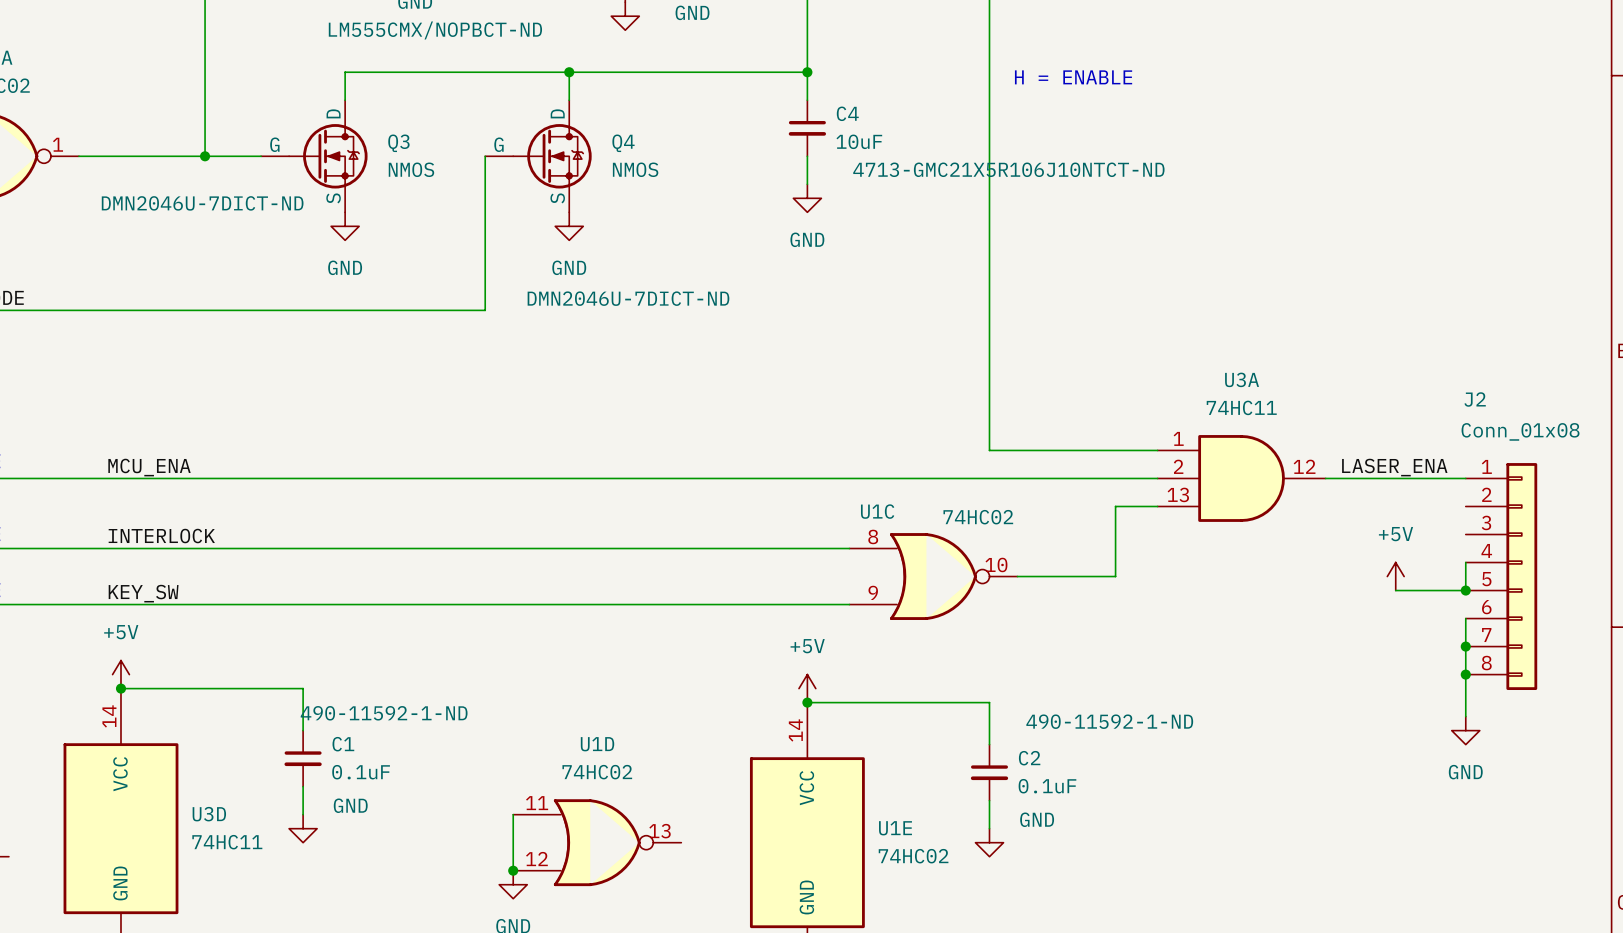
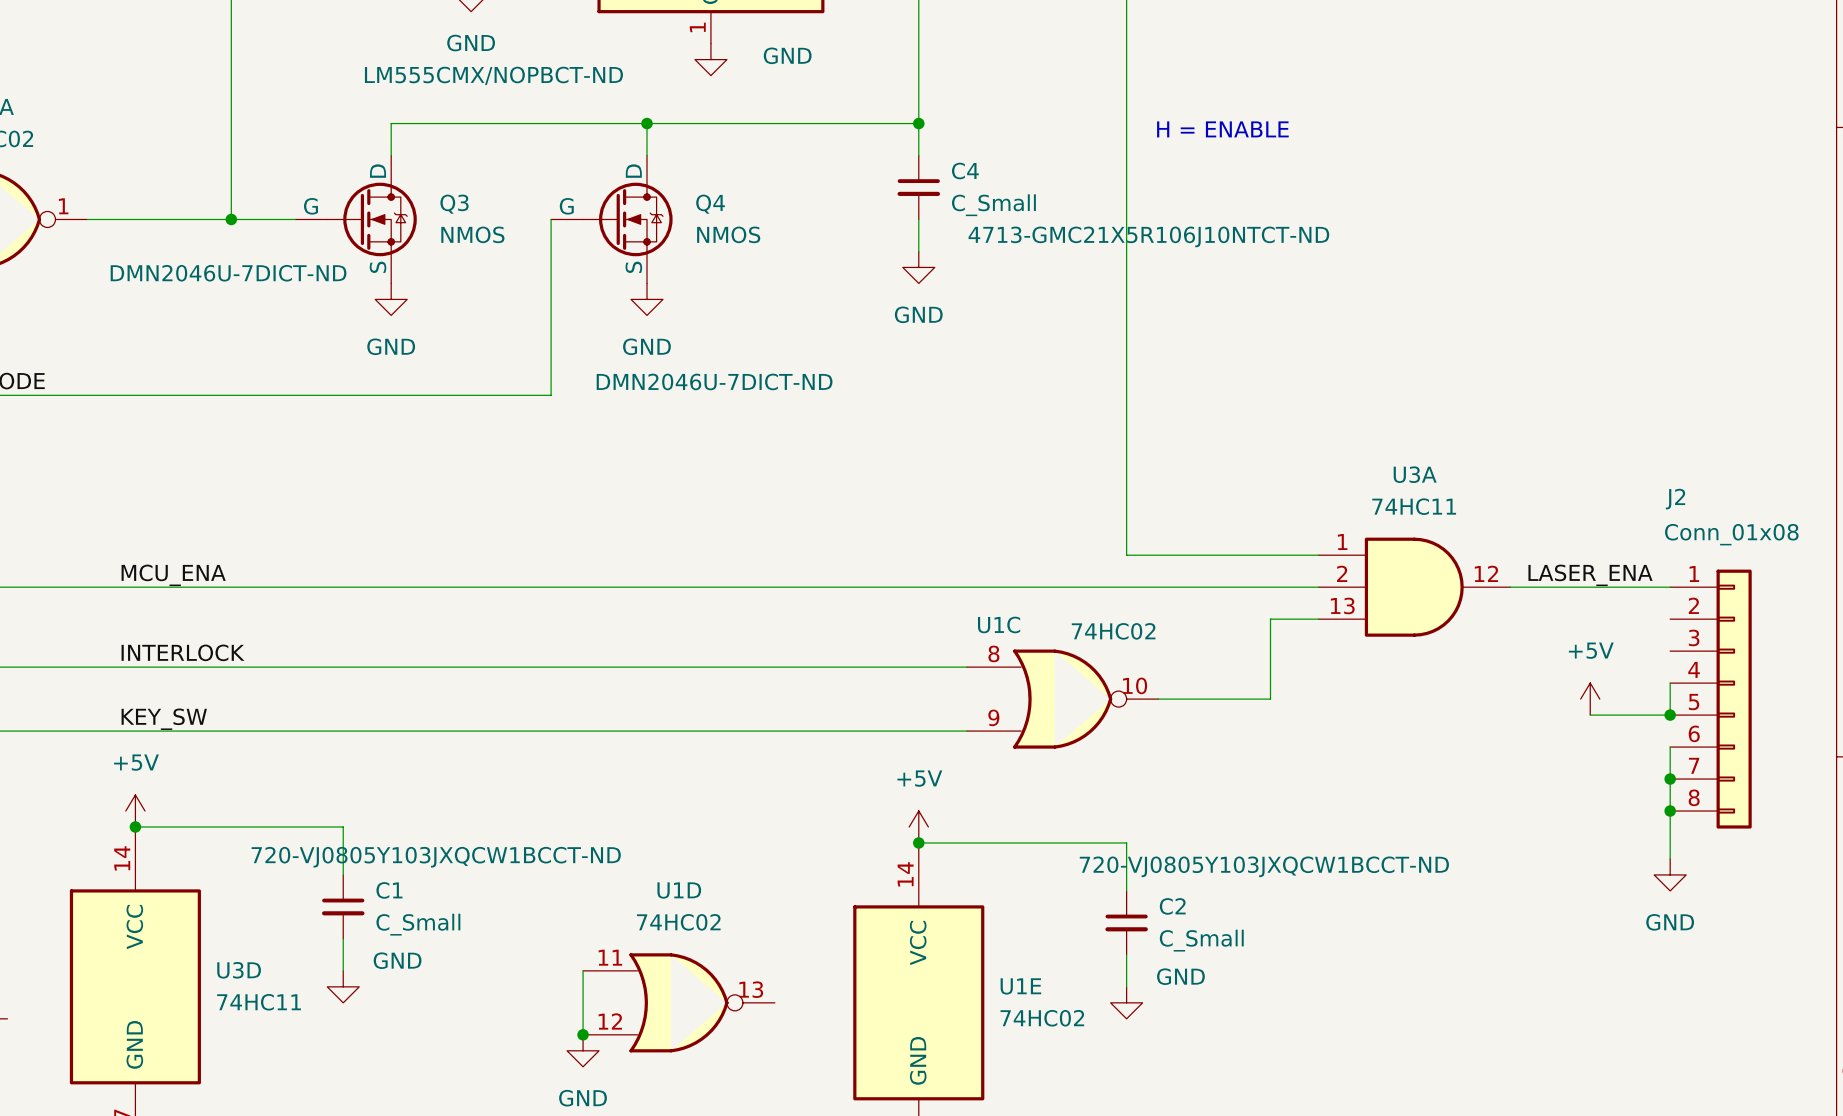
C4 value: 10uF (859, 141) -> C_Small (993, 205)
C1 text: 490-11592-1-ND (384, 713) -> 720-VJ0805Y103JXQCW1BCCT-ND (436, 857)
C2 text: 490-11592-1-ND (1109, 721) -> 720-VJ0805Y103JXQCW1BCCT-ND (1264, 866)
C1 value: 0.1uF (361, 772) -> C_Small (418, 924)
C2 value: 0.1uF (1047, 786) -> C_Small (1201, 940)

